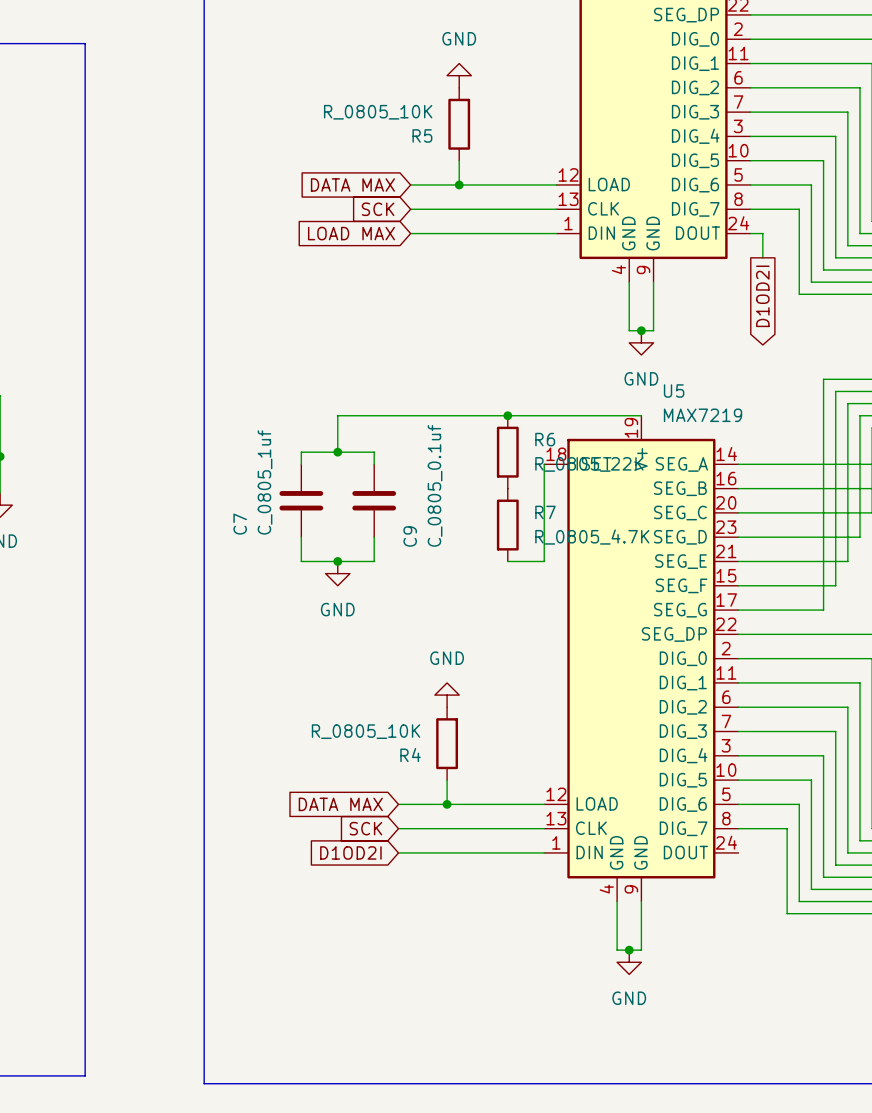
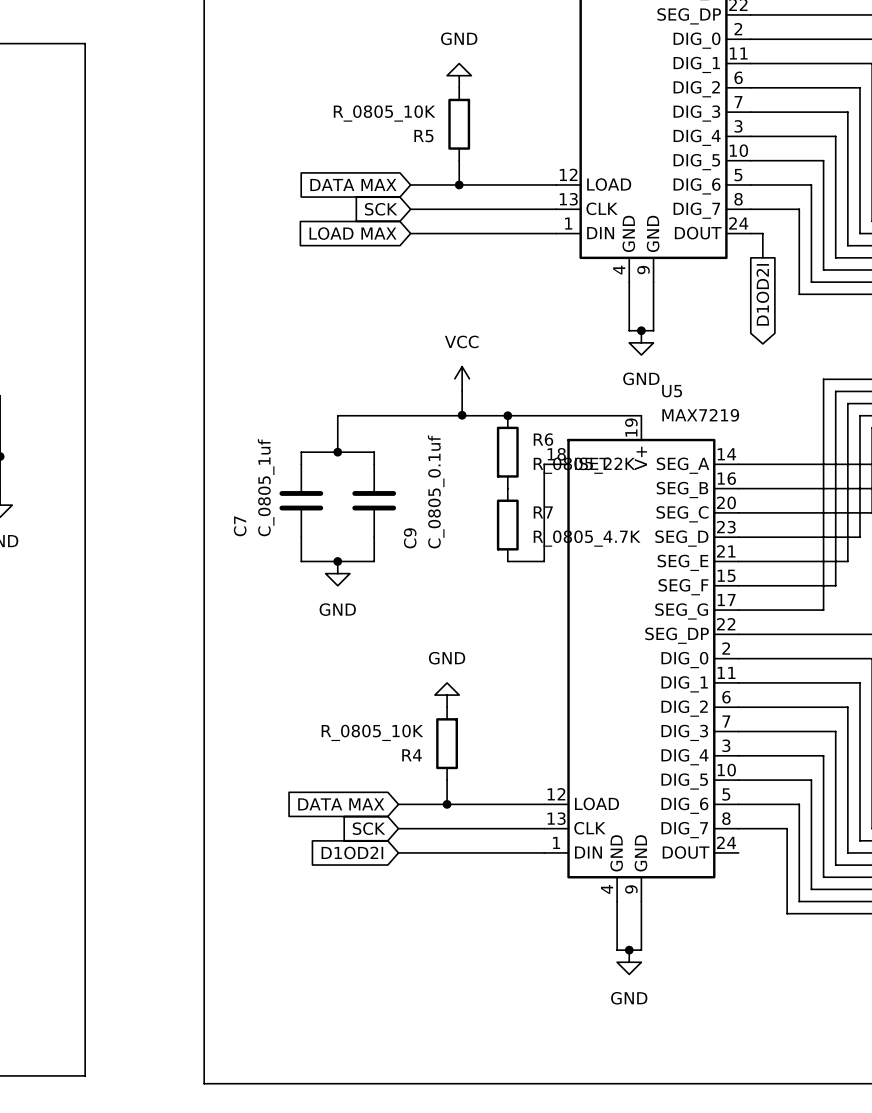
power symbol: none -> VCC (462, 378)
wire: none -> (462, 390) (462, 415)
junction: none -> (462, 415)

